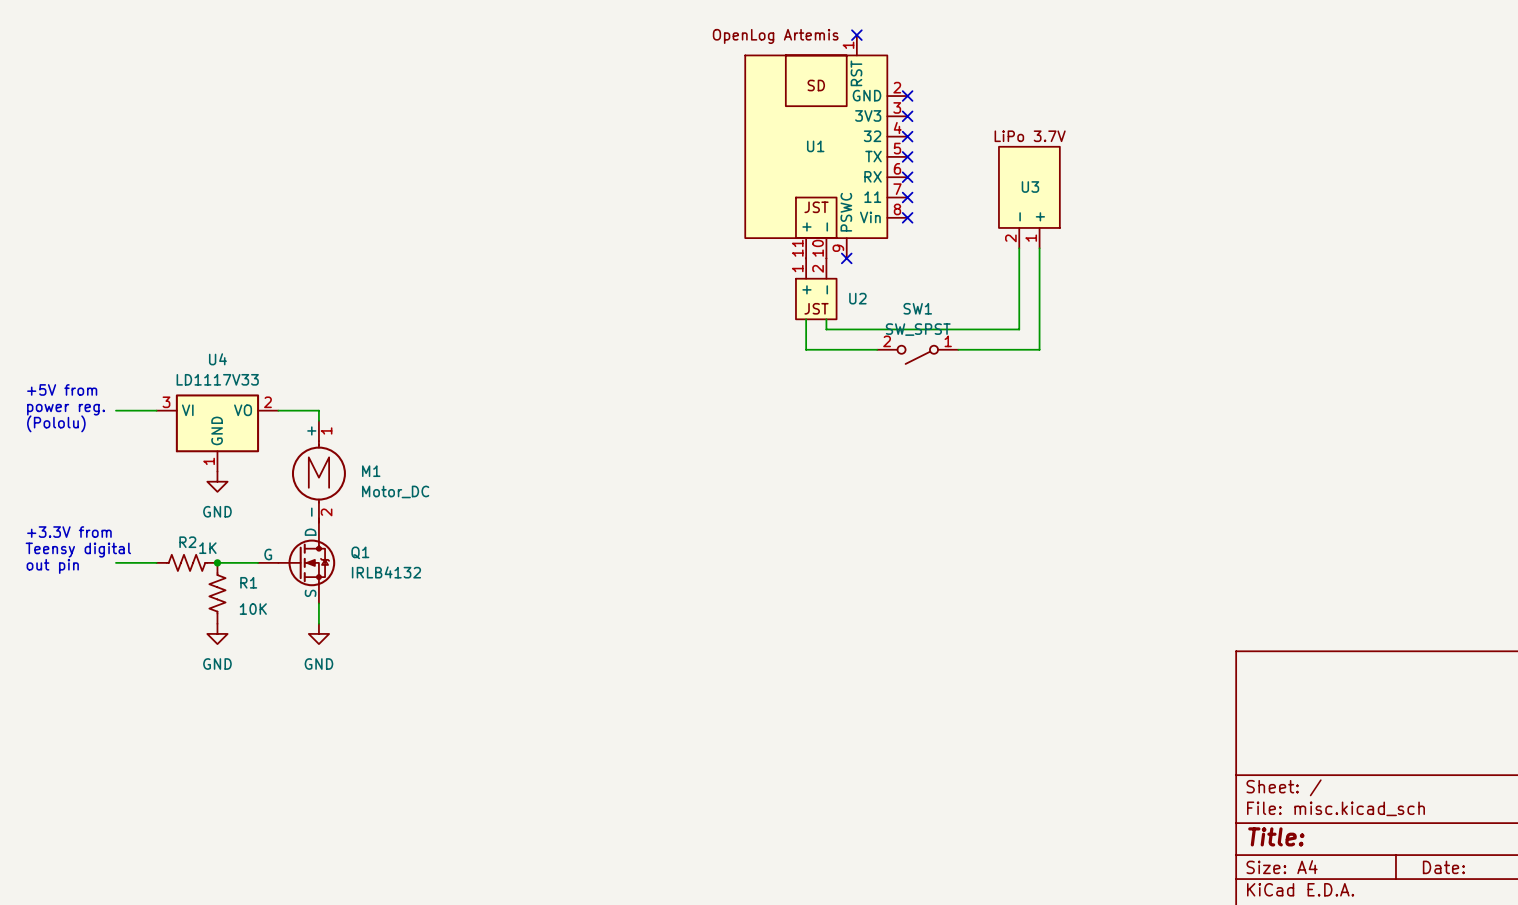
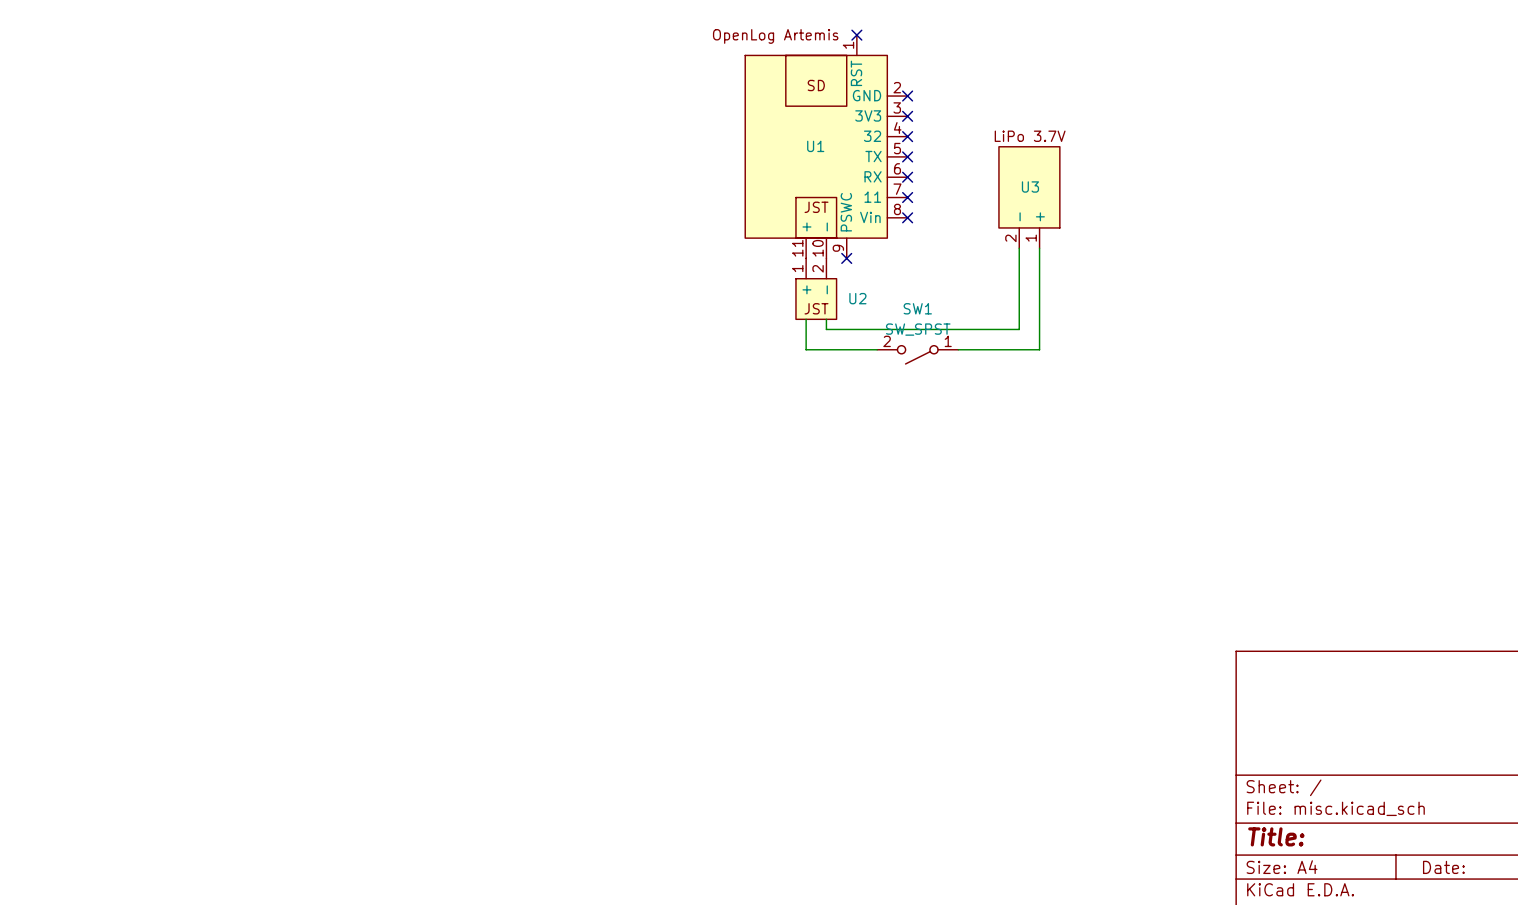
text: +5V from (62, 389) -> none
text: power reg. (66, 409) -> none
wire: (115, 410) (156, 410) -> none
wire: (278, 410) (318, 410) (318, 420) -> none
text: (Pololu) (56, 423) -> none
U4: LD1117V33 (217, 432) -> none
M1: Motor_DC (318, 471) -> none
power symbol: GND (217, 481) -> none
text: +3.3V from (69, 532) -> none
text: Teensy digital (78, 550) -> none
wire: (115, 562) (156, 562) -> none
R2: 1K (187, 562) -> none
wire: (217, 562) (258, 562) -> none
junction: (217, 562) -> none
Q1: IRLB4132 (296, 562) -> none
text: out pin (52, 566) -> none
R1: 10K (217, 593) -> none
wire: (318, 603) (318, 623) -> none
power symbol: GND (217, 633) -> none
power symbol: GND (318, 633) -> none

